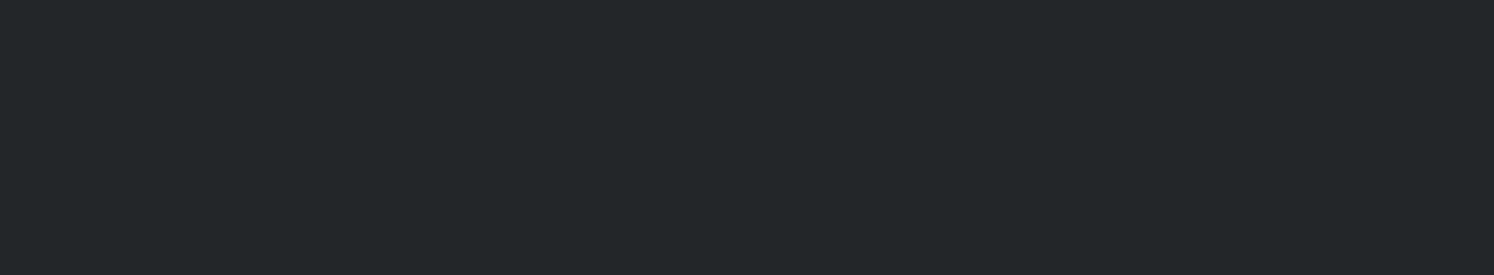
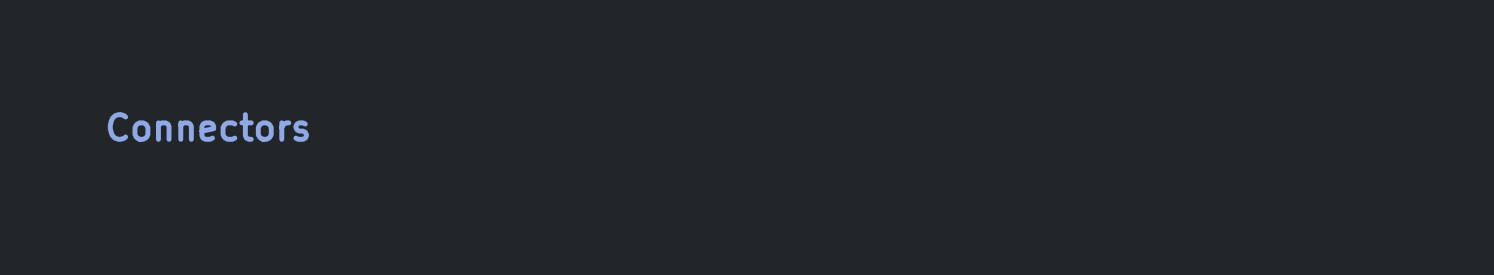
text: none -> Connectors (208, 126)

